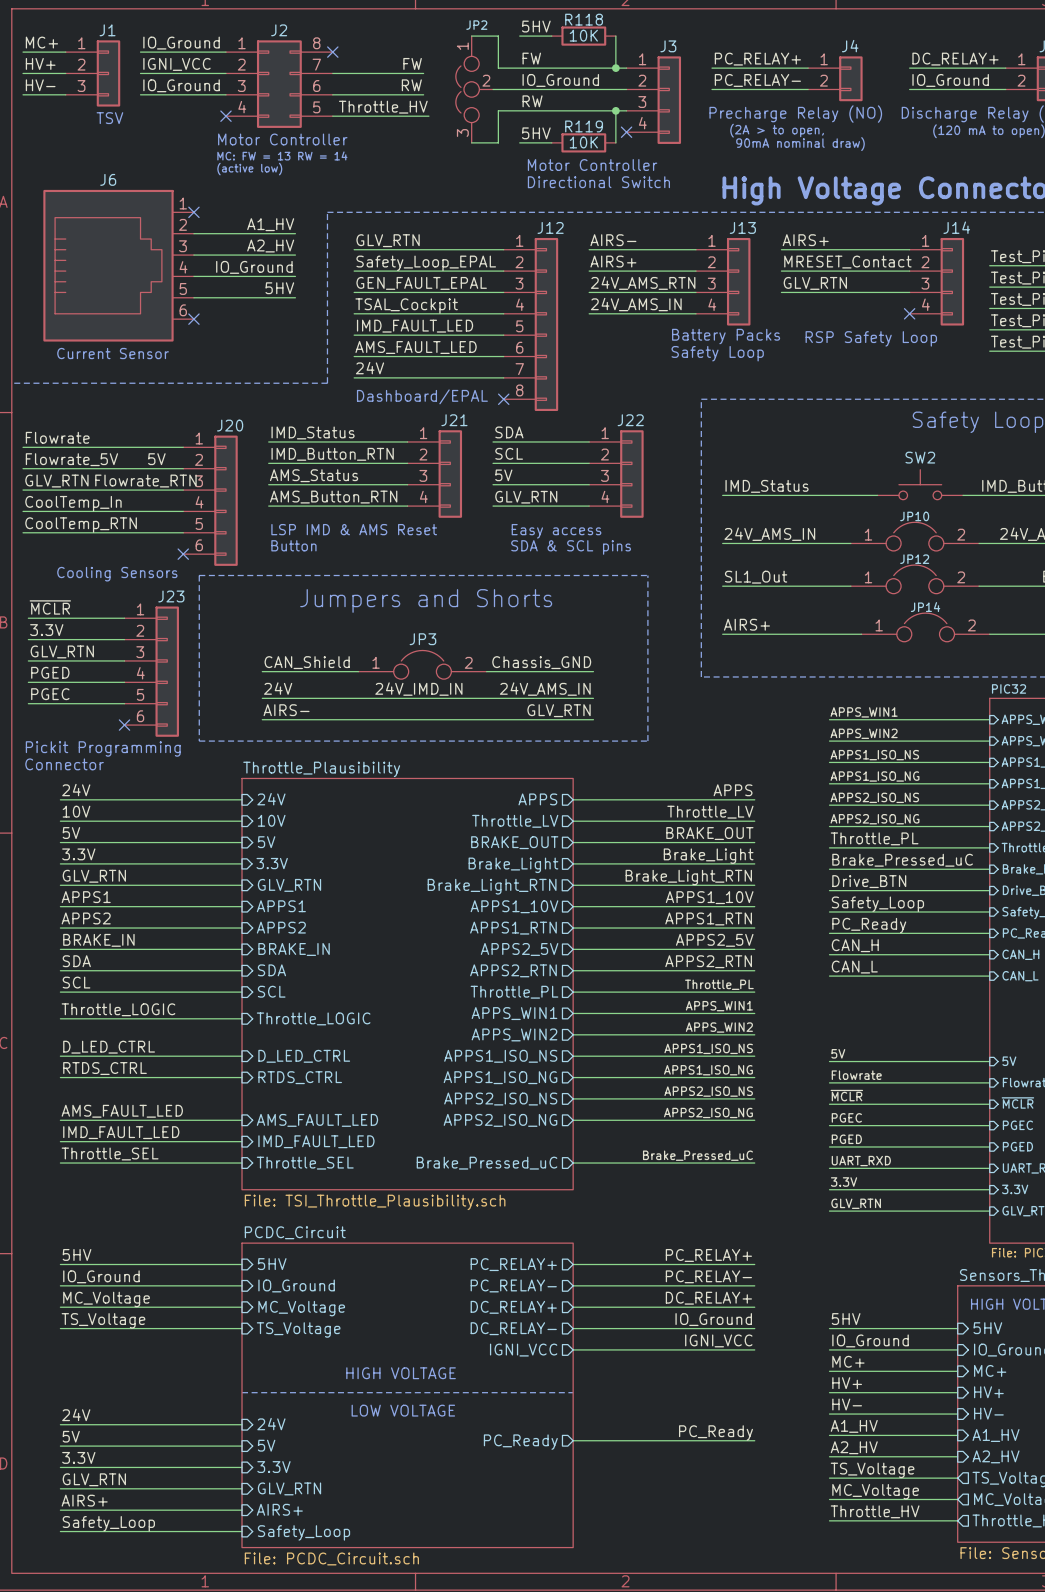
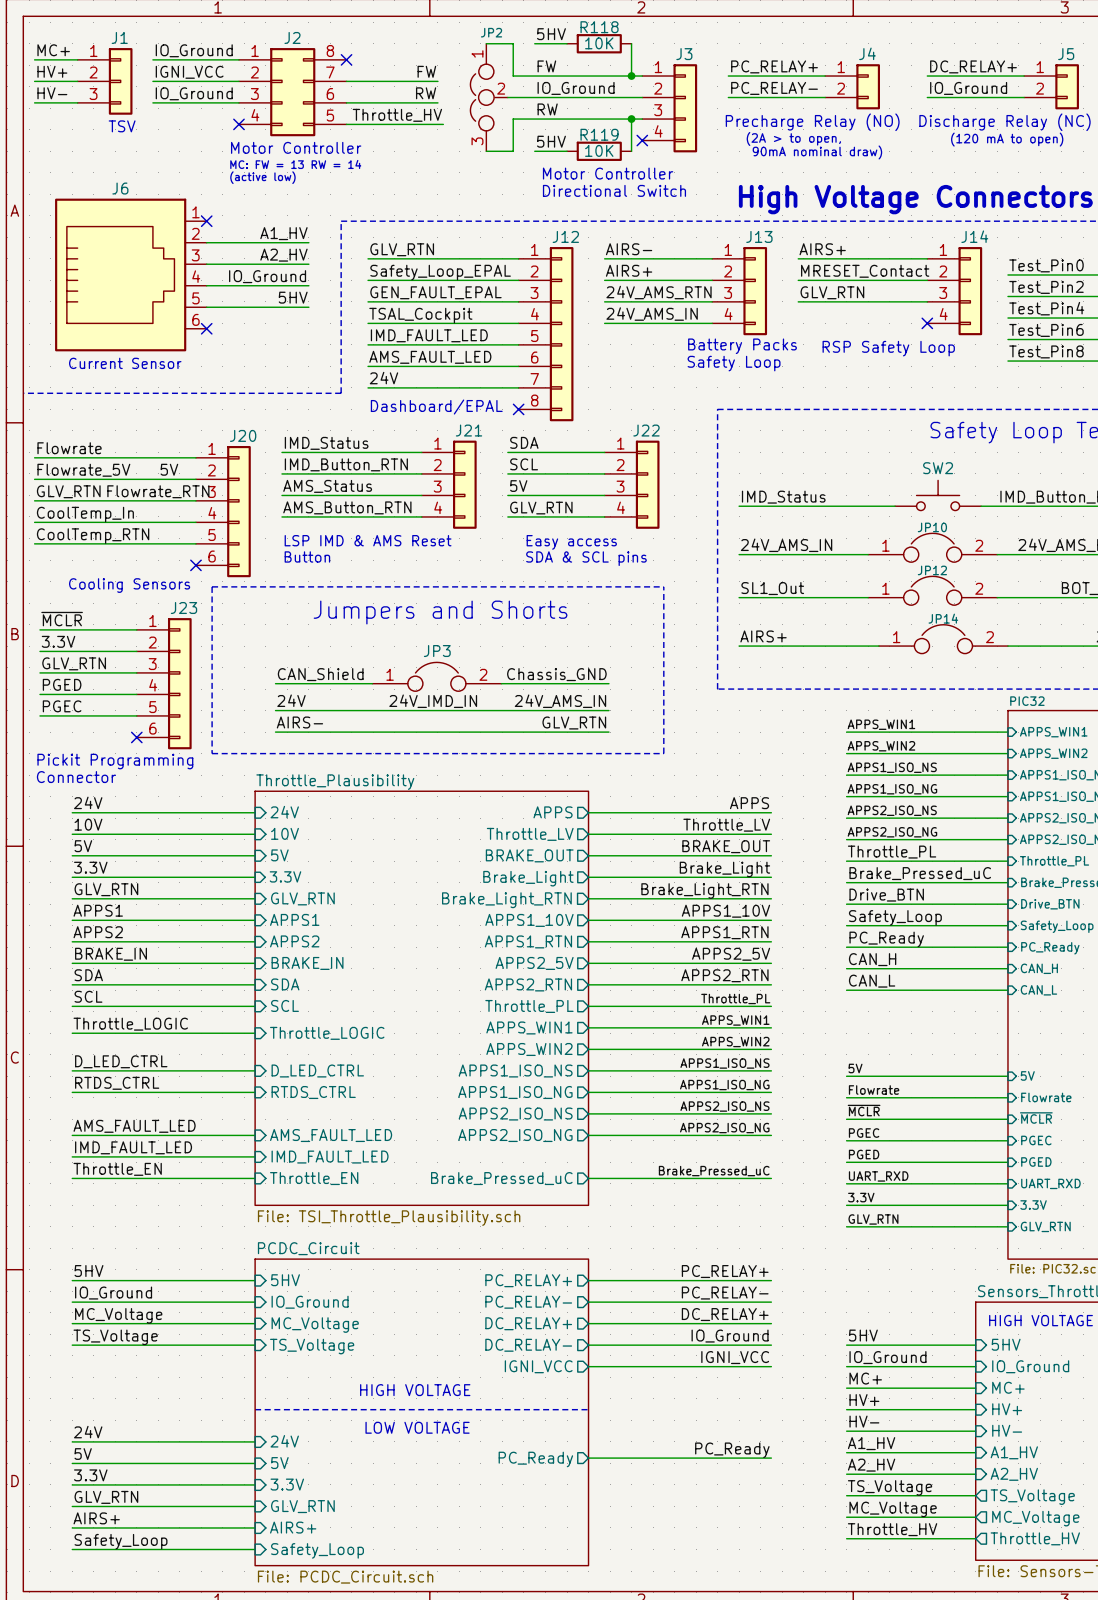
label: Throttle_SEL (110, 1153) -> Throttle_EN (117, 1169)
sheet pin: Throttle_SEL (305, 1163) -> Throttle_EN (314, 1178)

